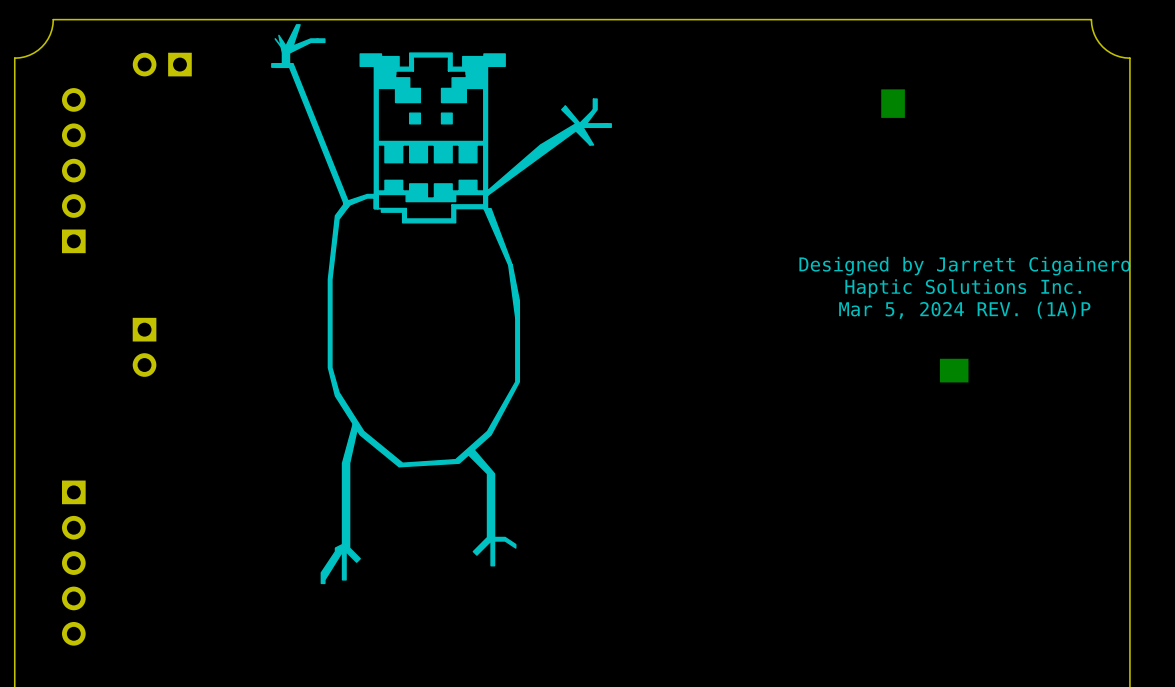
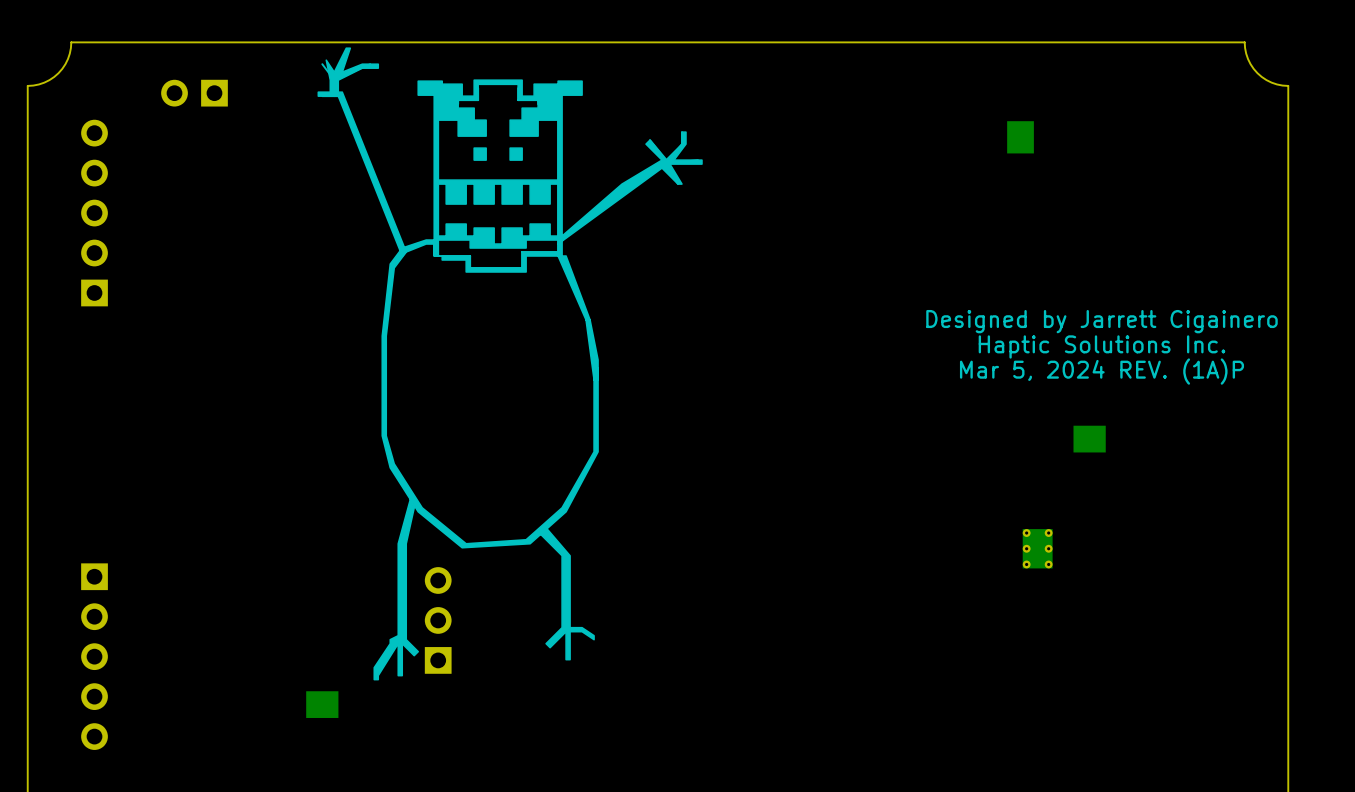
part: (144, 347) -> none
part: none -> (1037, 548)
part: none -> (438, 620)
part: none -> (322, 704)

